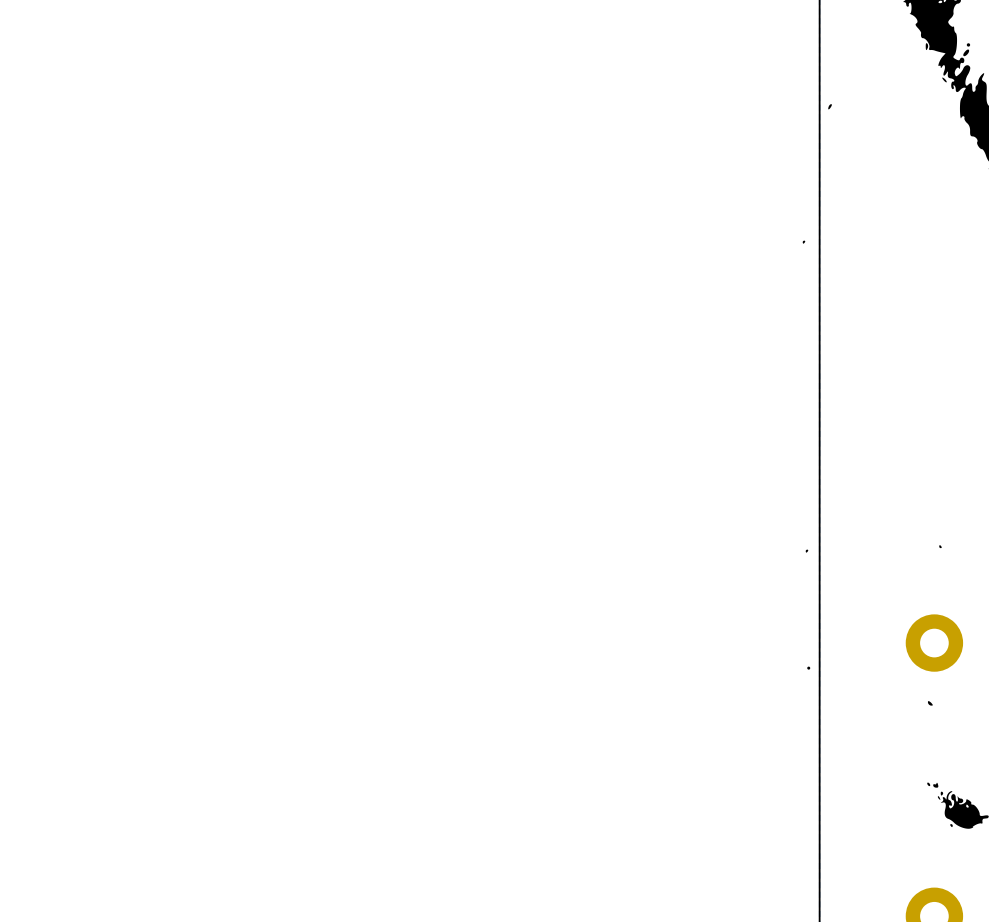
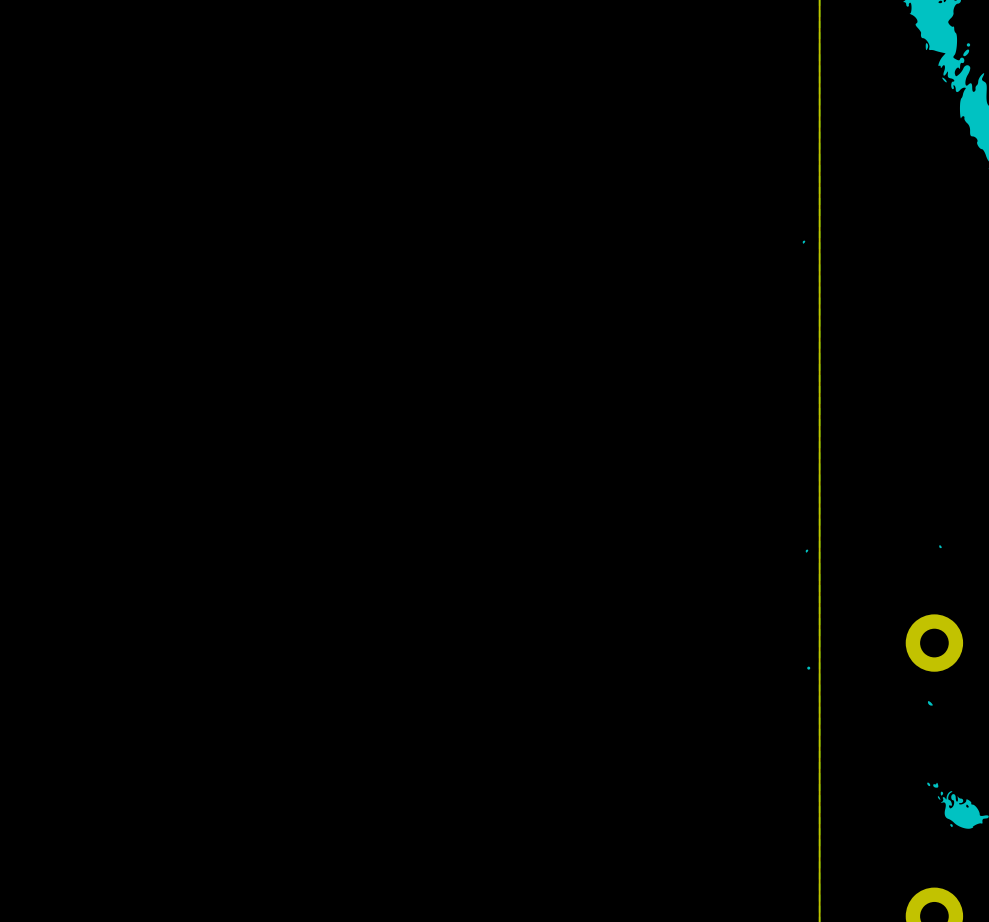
drawing: [828, 104, 832, 110] -> none

